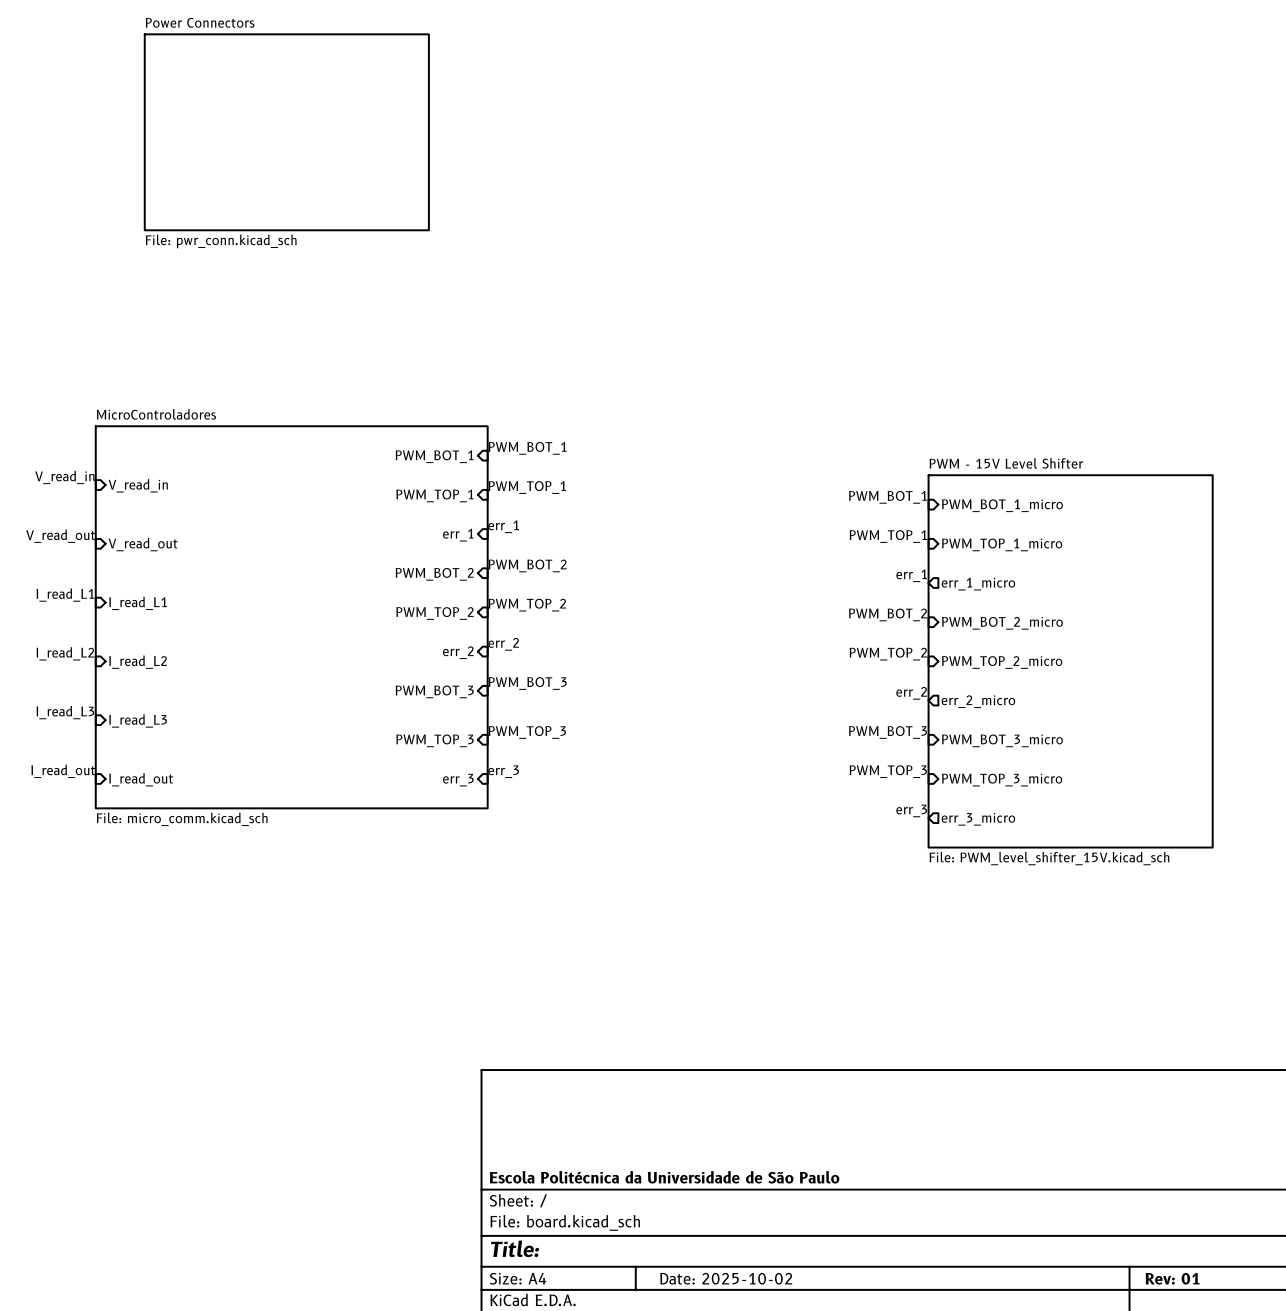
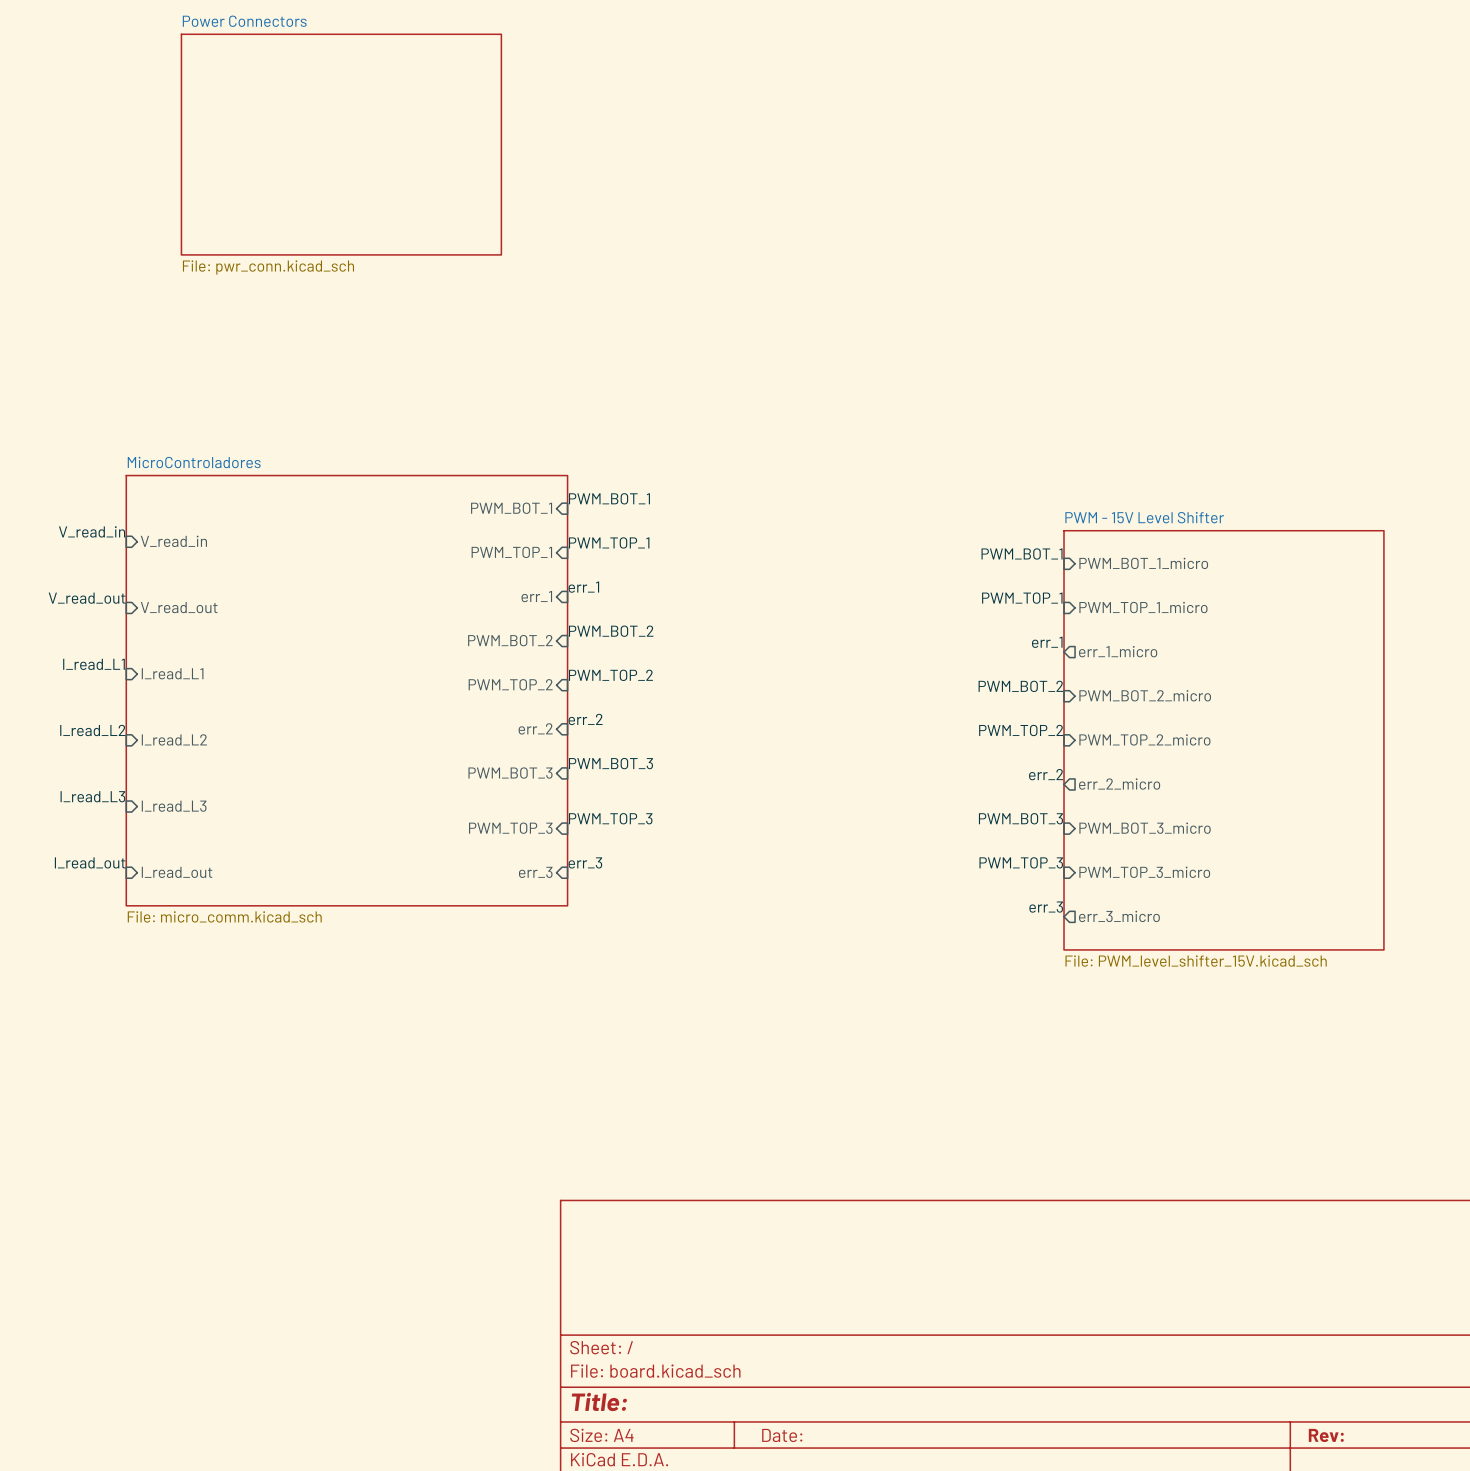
title block: Escola Politécnica da Universidade de São Paulo (664, 1177) -> none
title block: Date: 2025-10-02 (726, 1278) -> Date: (782, 1435)
title block: Rev: 01 (1172, 1278) -> Rev: (1326, 1435)

